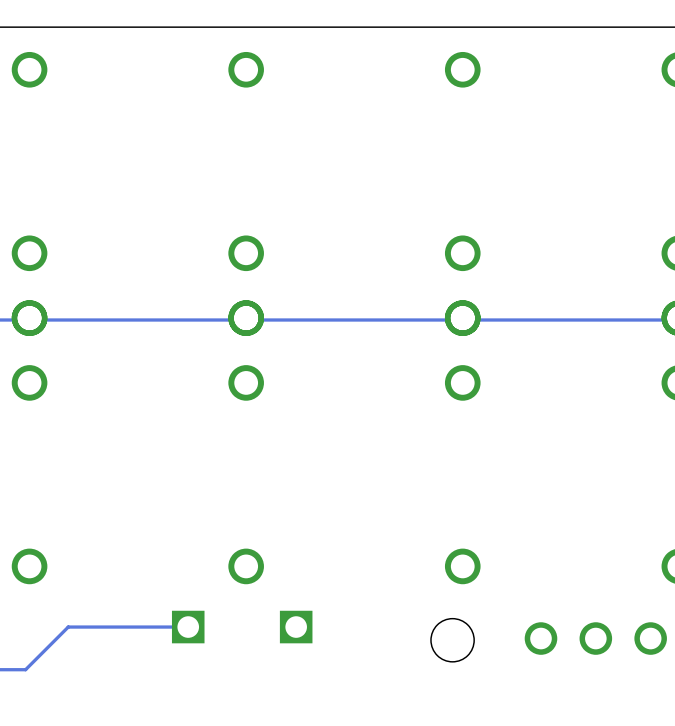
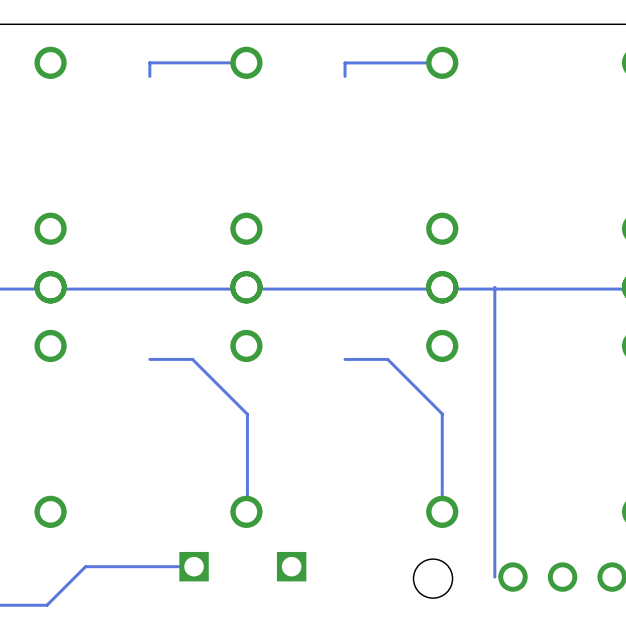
track: none -> (149, 62) (149, 76)
track: none -> (246, 62) (149, 62)
track: none -> (442, 62) (345, 62) (345, 76)
track: none -> (494, 287) (494, 577)
track: none -> (149, 359) (192, 359) (247, 414) (246, 511)
track: none -> (345, 359) (387, 359) (442, 414) (442, 511)

